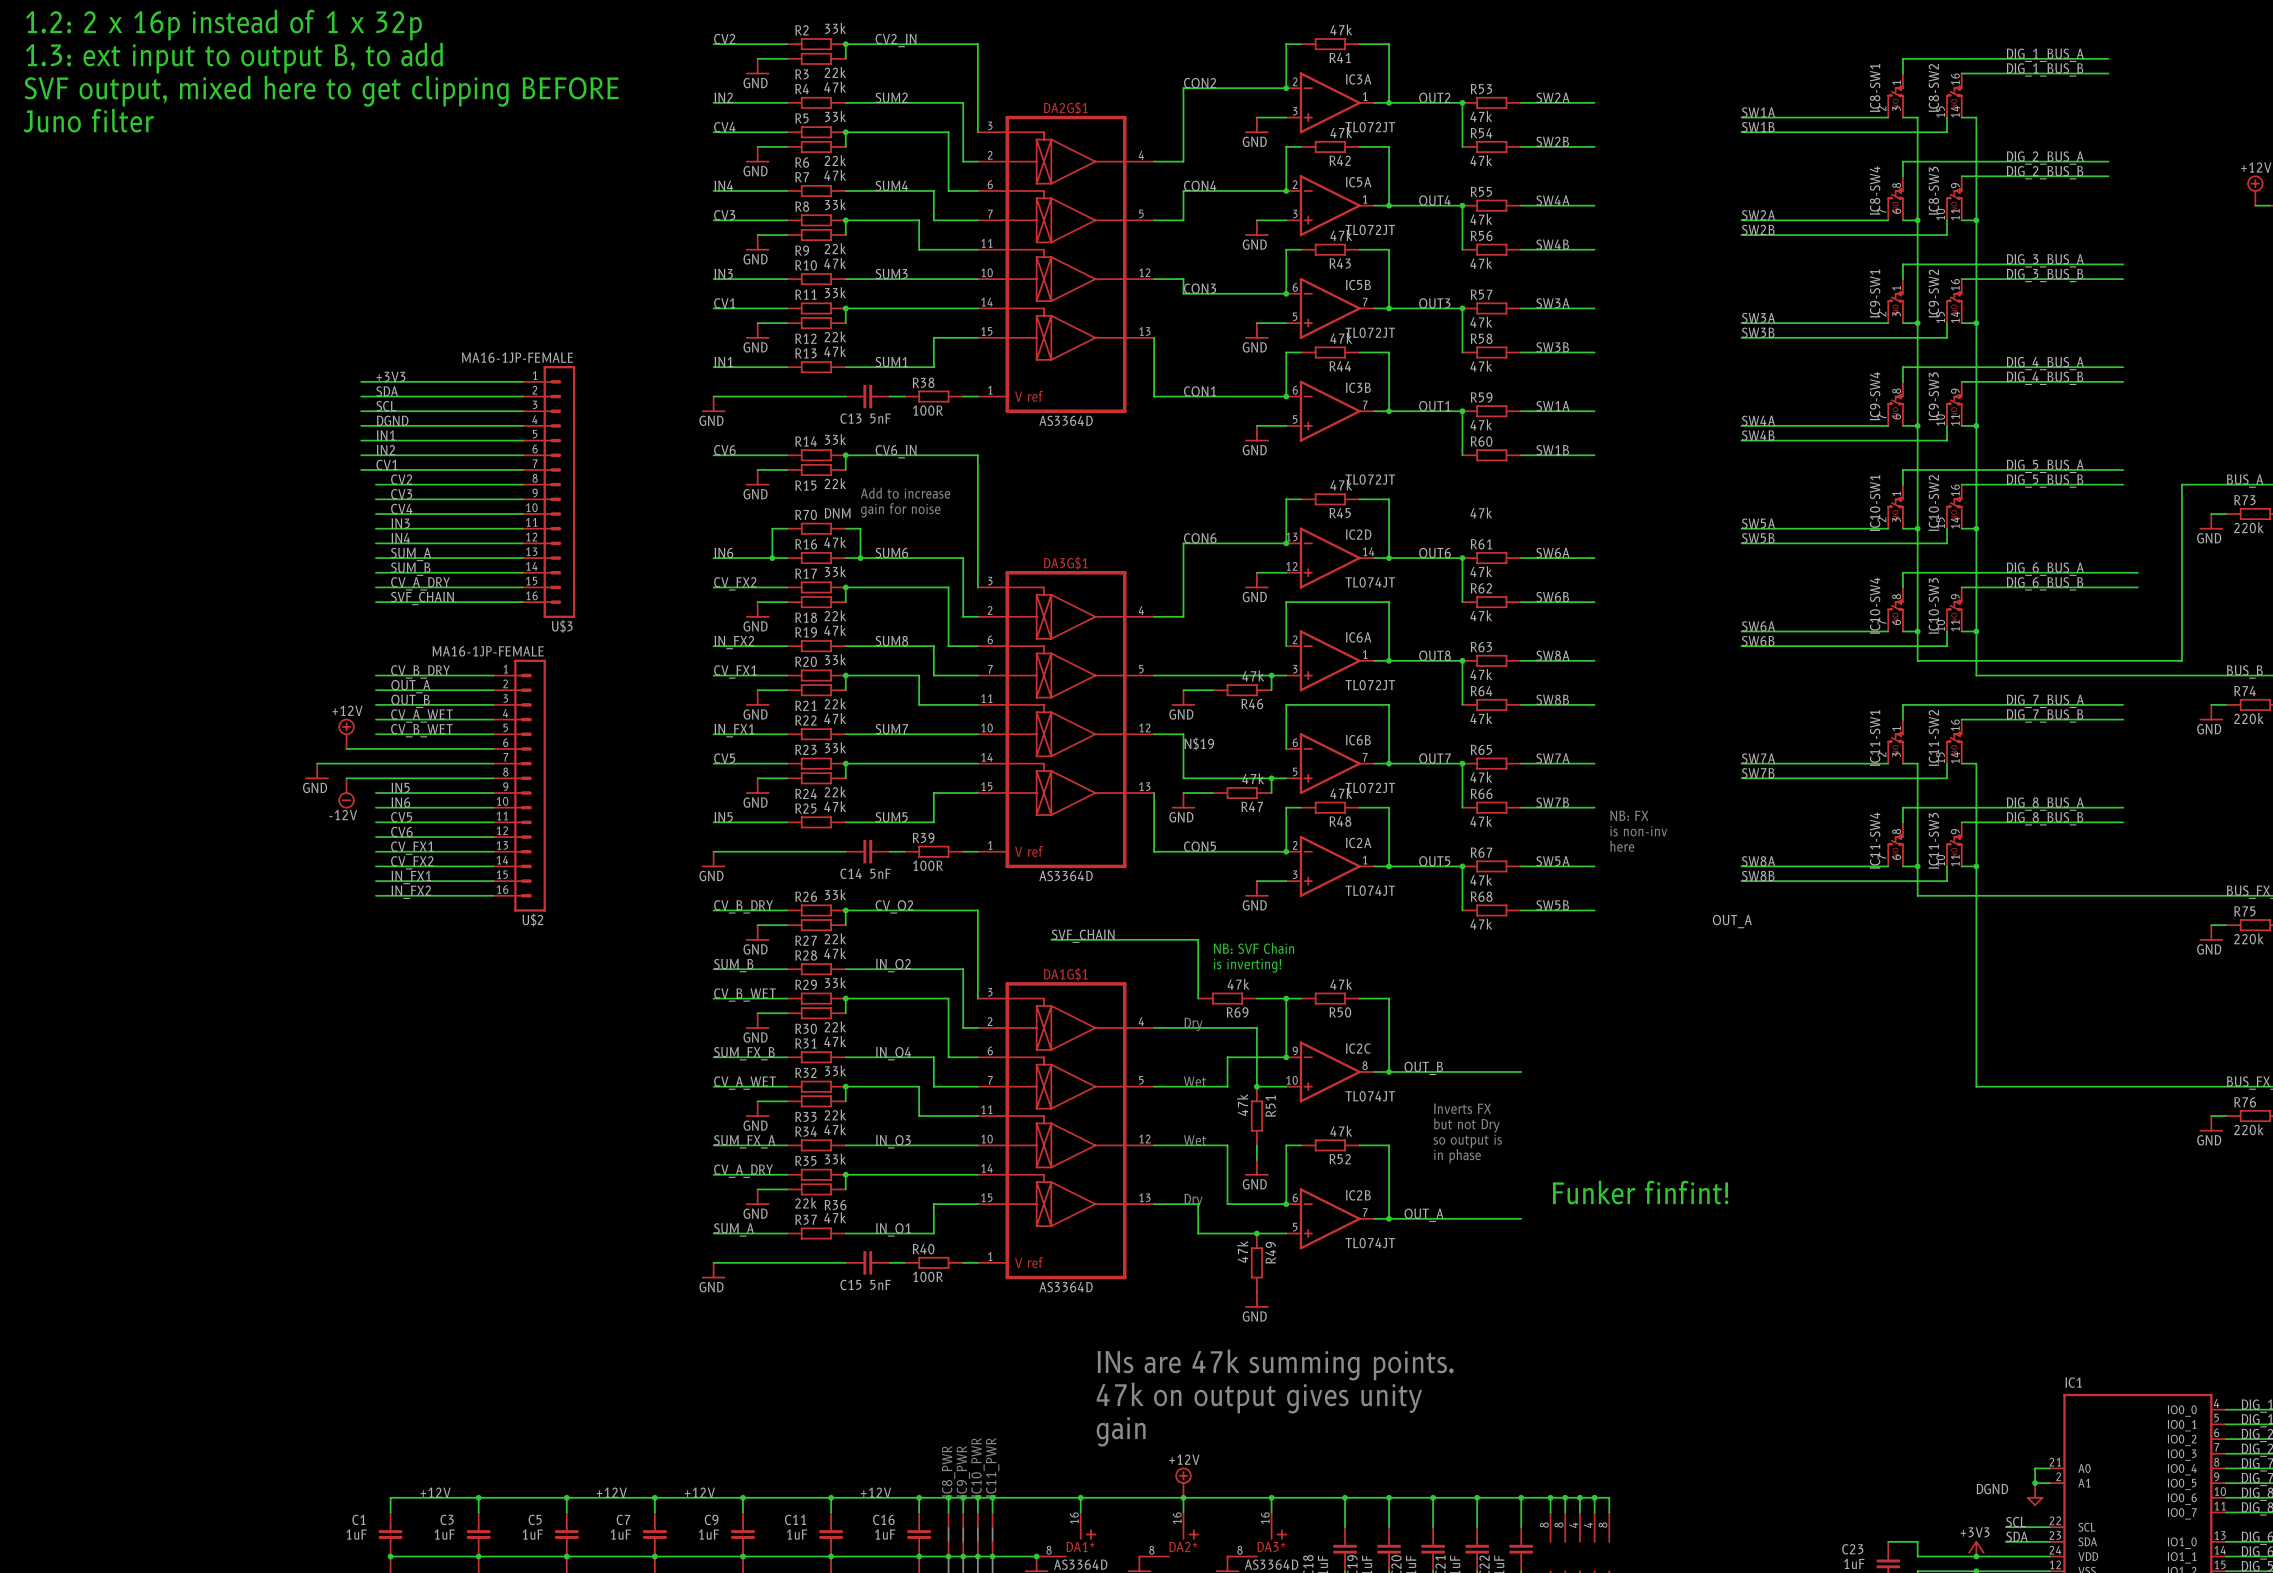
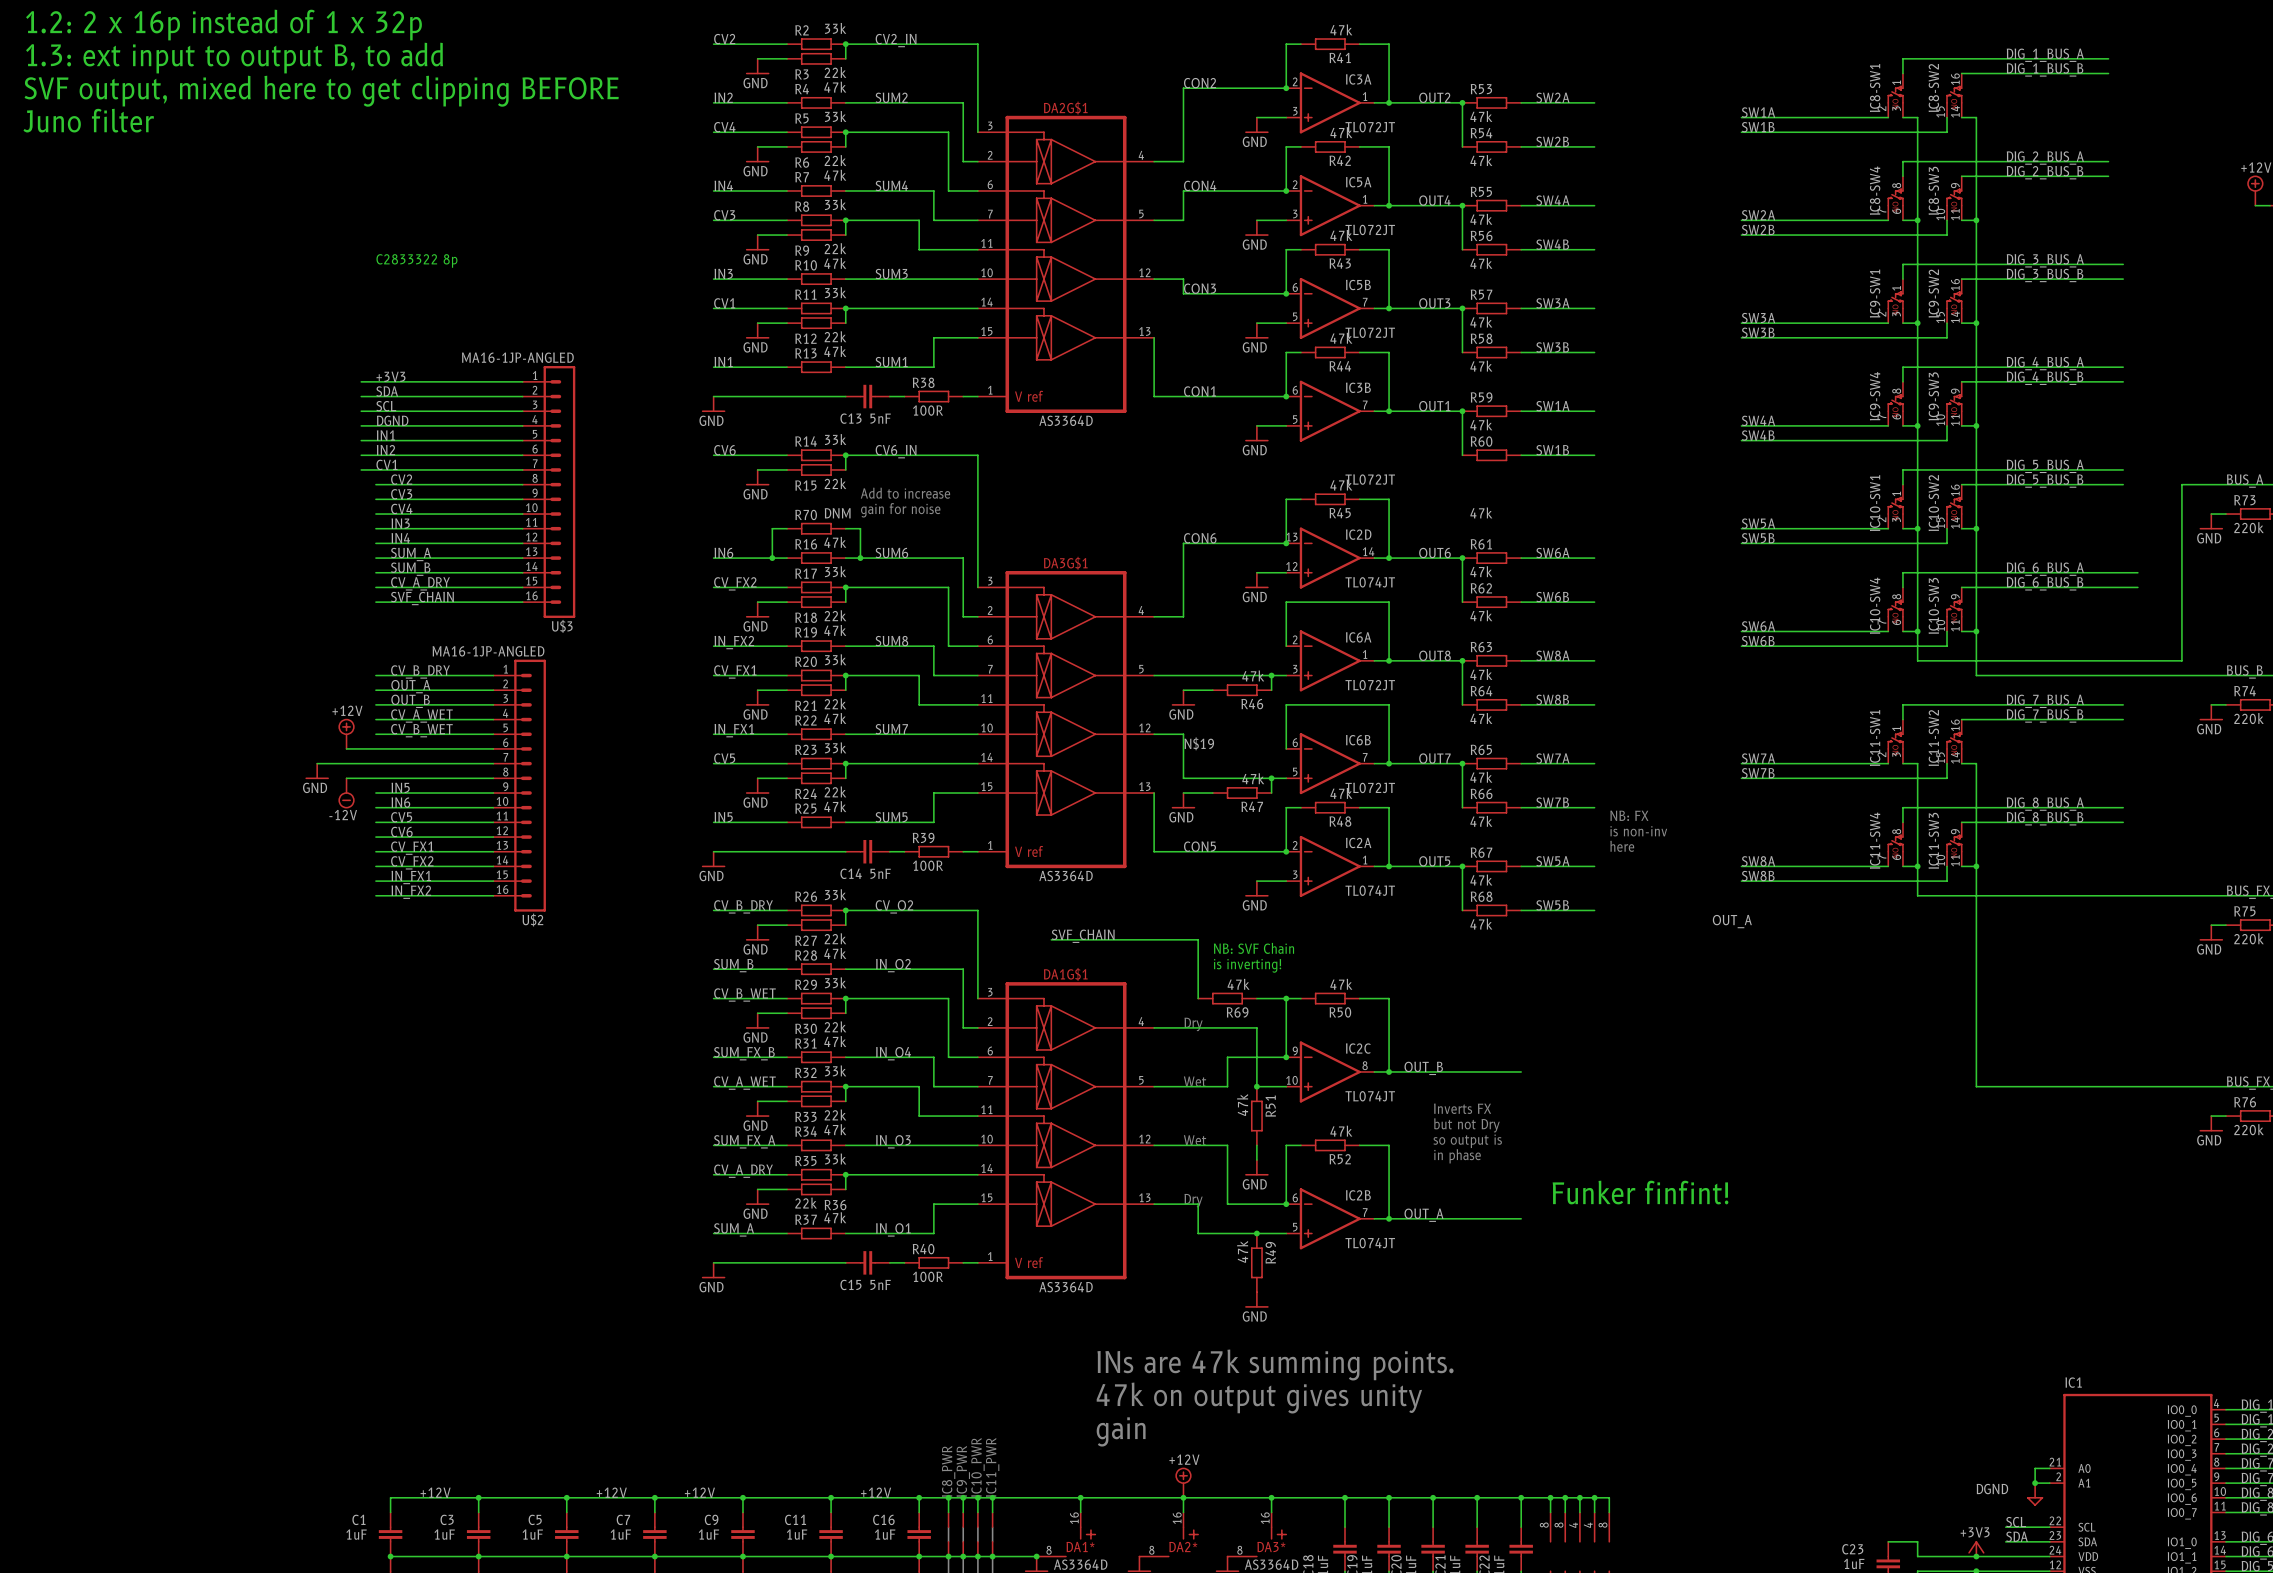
text: none -> C2833322 8p (416, 260)
U$3 value: MA16-1JP-FEMALE (517, 357) -> MA16-1JP-ANGLED (517, 357)
U$2 value: MA16-1JP-FEMALE (488, 651) -> MA16-1JP-ANGLED (488, 651)

